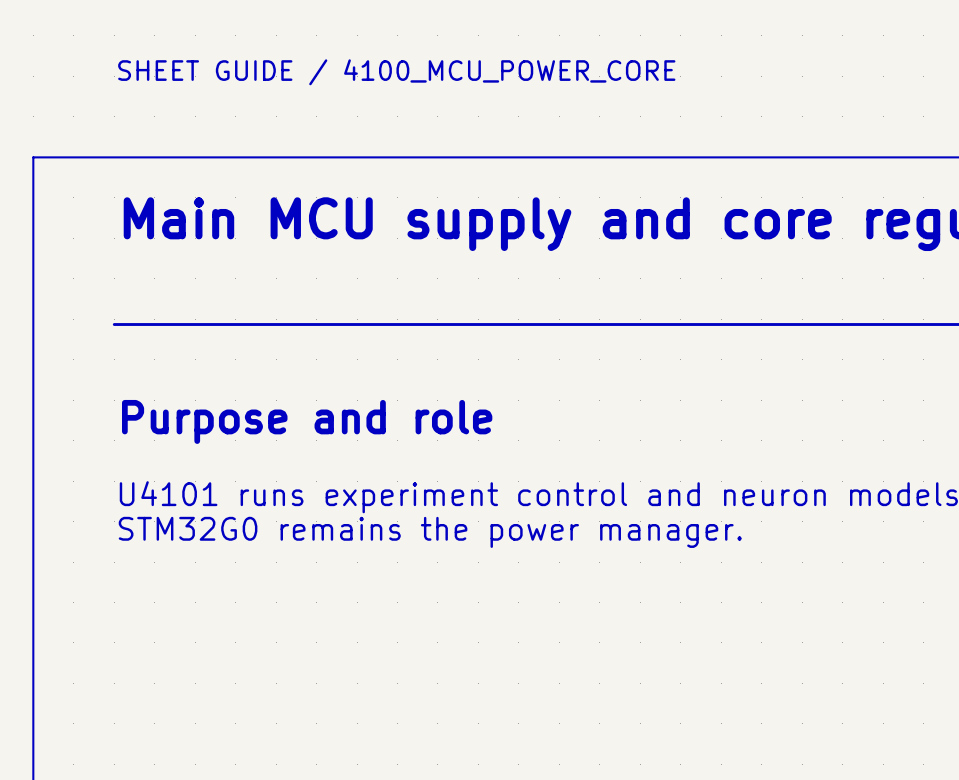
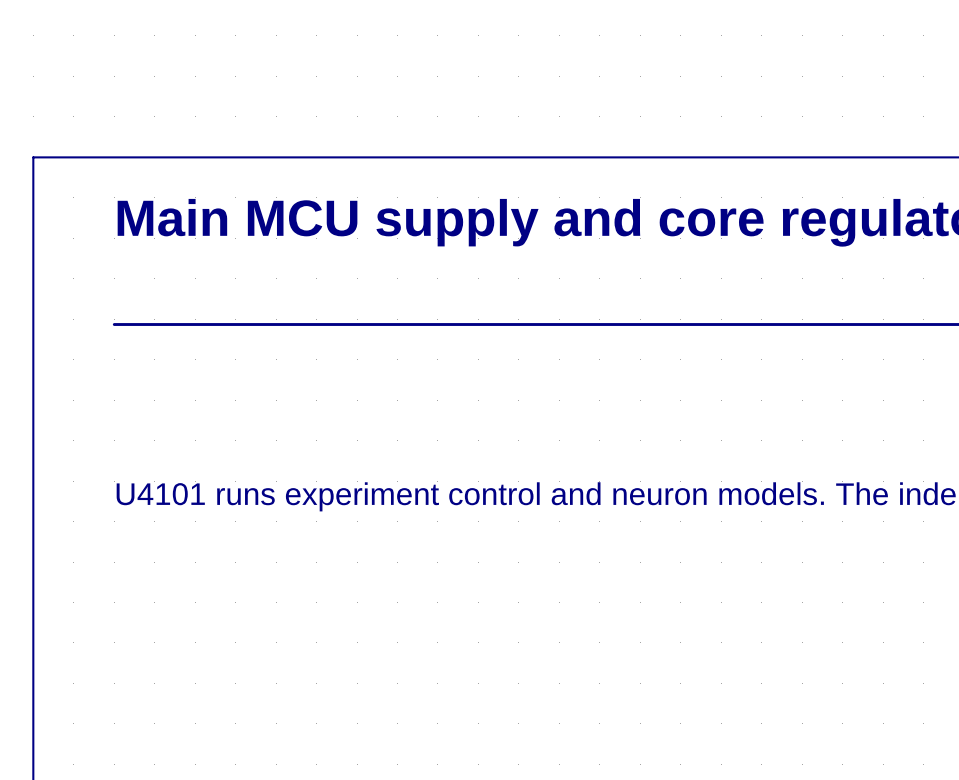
text: SHEET GUIDE / 4100_MCU_POWER_CORE (396, 72) -> none
text: Purpose and role (307, 421) -> none
text: STM32G0 remains the power manager. (430, 532) -> none

